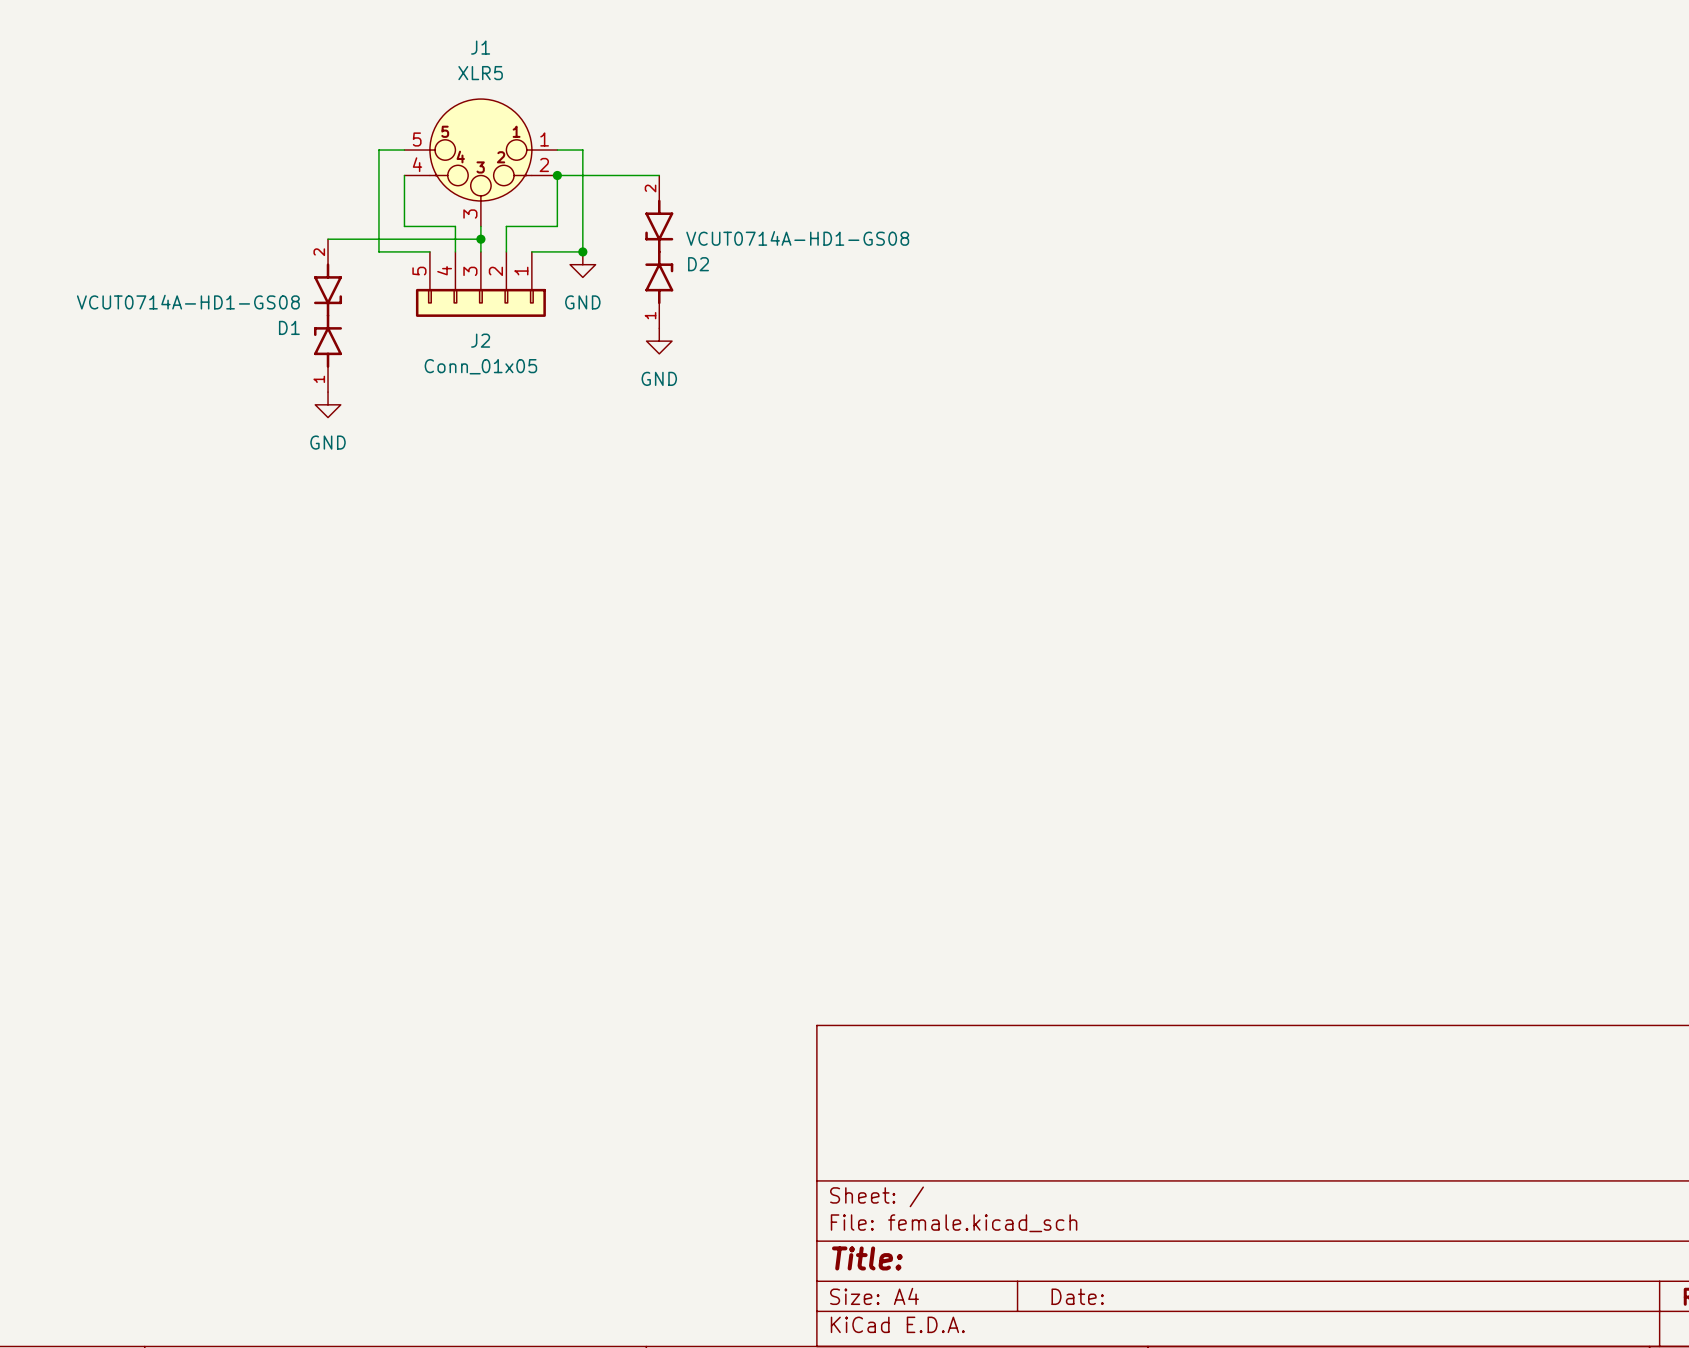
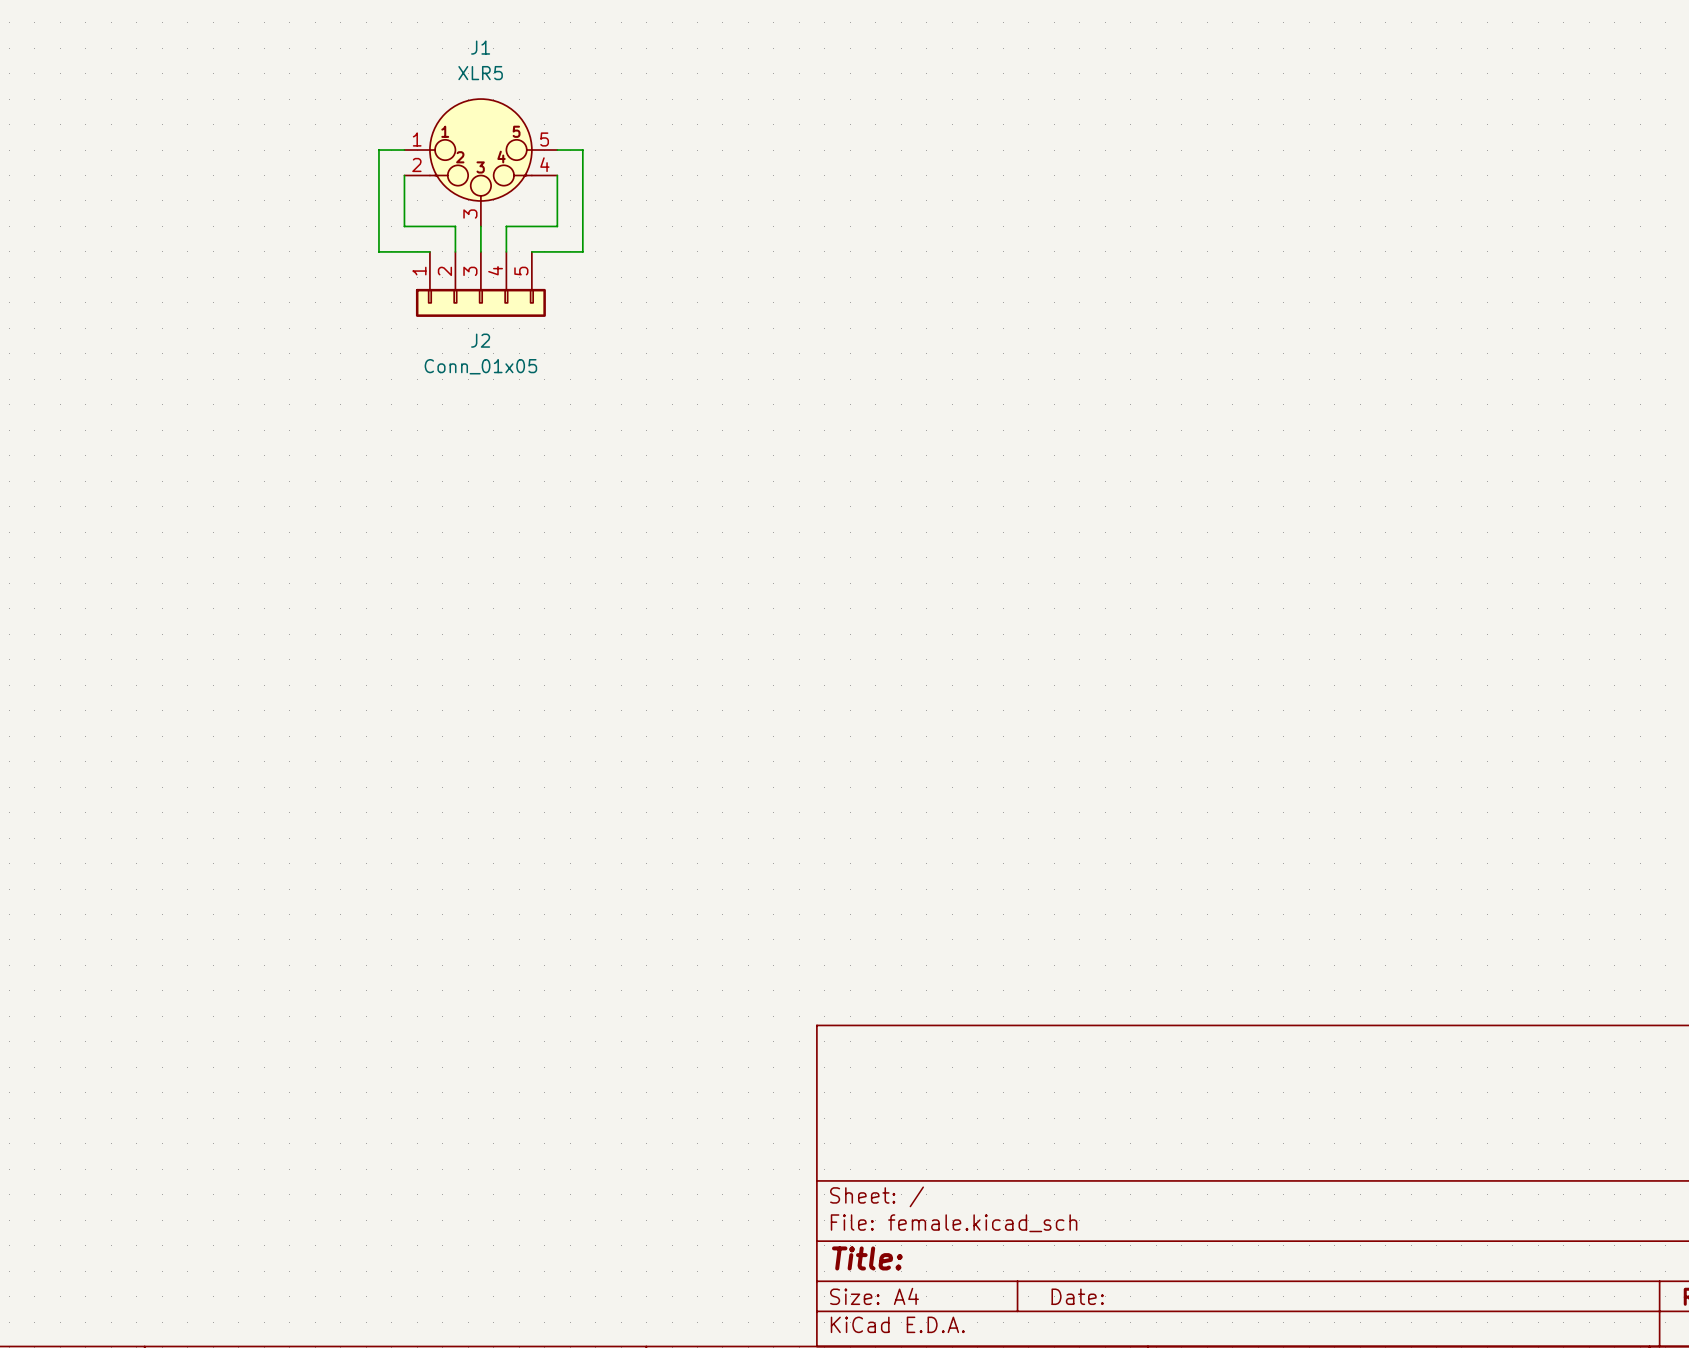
J1 flip: as is (480, 150) -> left-right (480, 150)
wire: (557, 175) (659, 175) -> none
junction: (557, 175) -> none
wire: (328, 239) (480, 239) -> none
junction: (480, 239) -> none
junction: (582, 251) -> none
D2: VCUT0714A-HD1-GS08 (659, 251) -> none
power symbol: GND (582, 264) -> none
J2 flip: as is (480, 302) -> left-right (480, 302)
D1: VCUT0714A-HD1-GS08 (328, 315) -> none
power symbol: GND (659, 341) -> none
power symbol: GND (328, 404) -> none

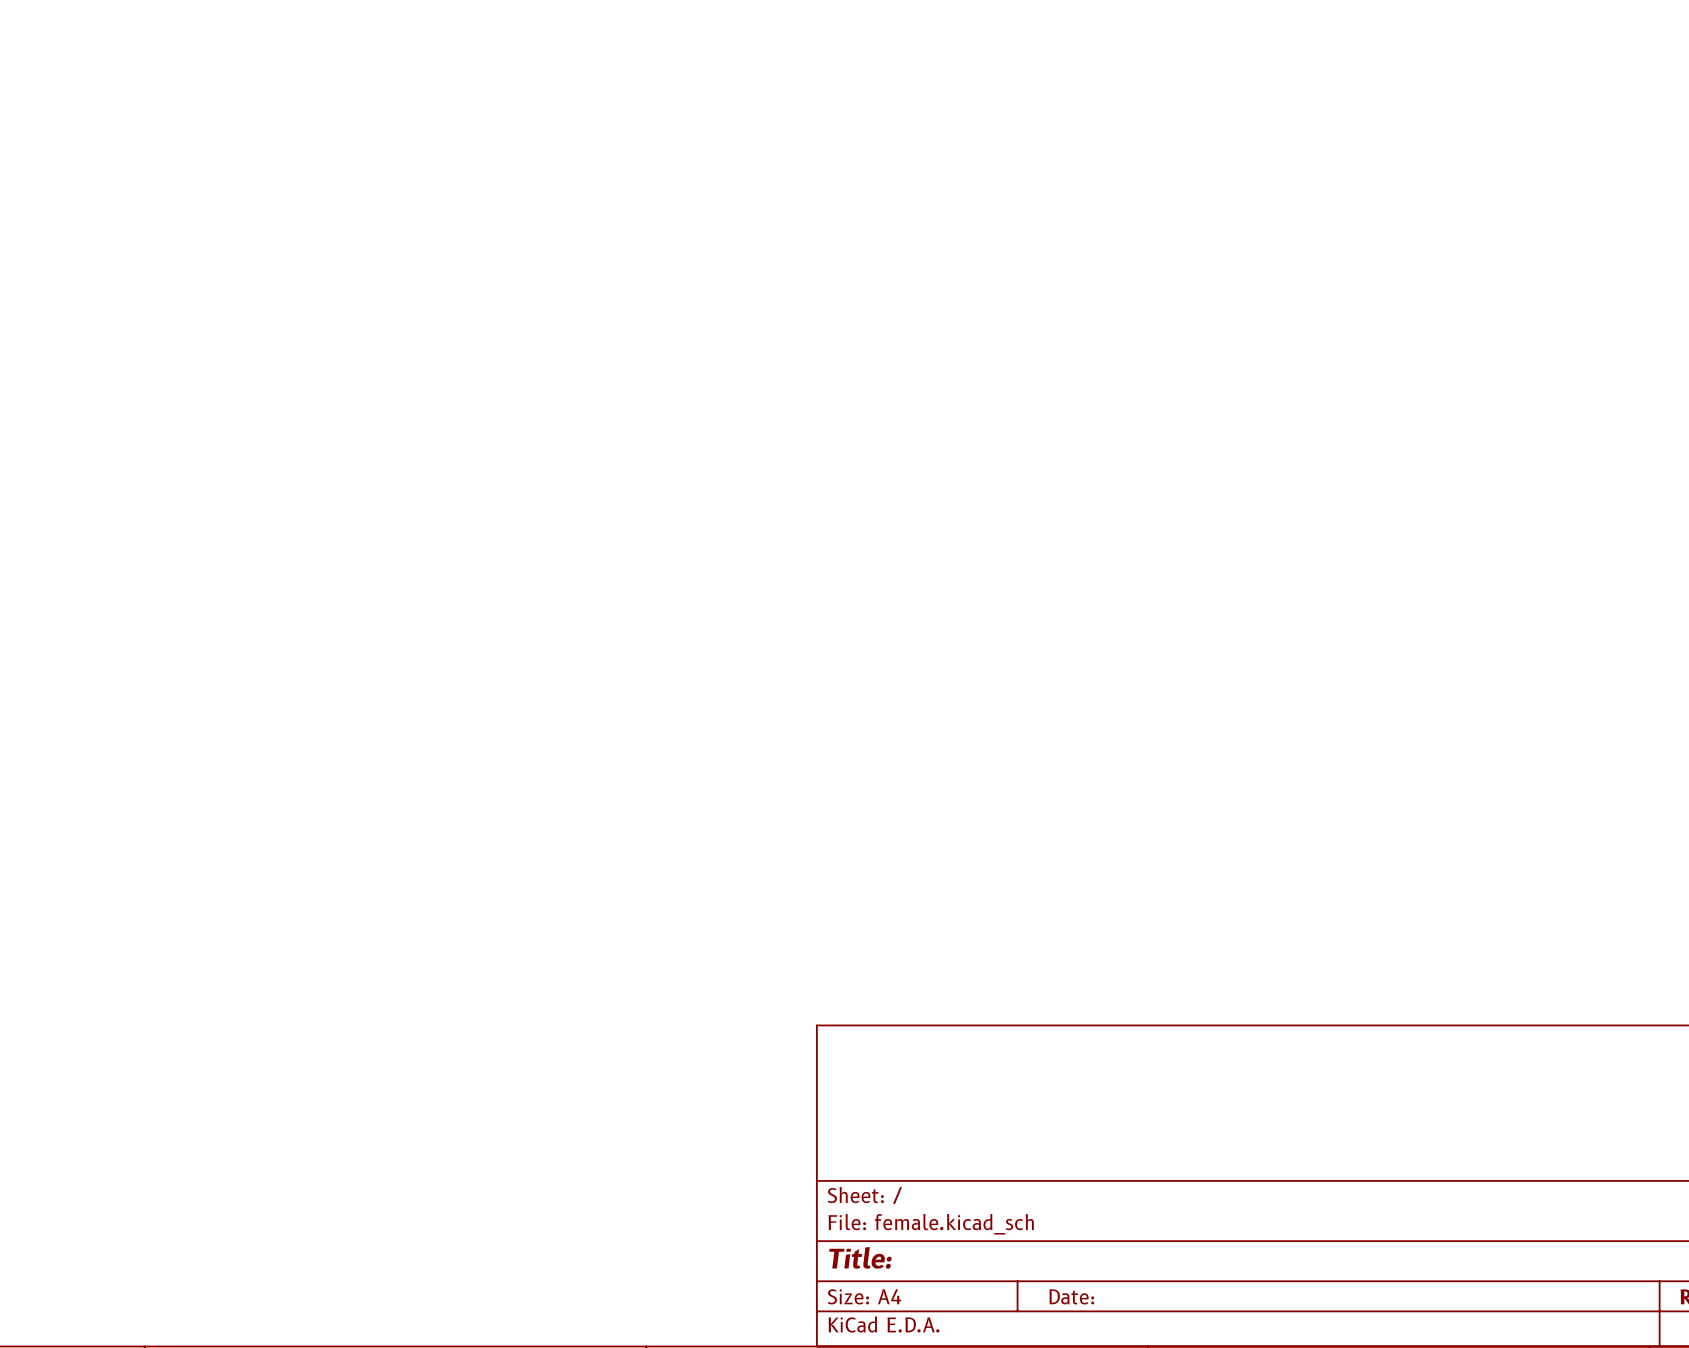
wire: (404, 150) (378, 150) (378, 251) (429, 251) -> none
wire: (557, 150) (582, 150) (582, 251) (531, 251) -> none
J1: XLR5 (480, 162) -> none
wire: (404, 175) (404, 226) (455, 226) (455, 251) -> none
wire: (557, 175) (557, 226) (506, 226) (506, 251) -> none
wire: (480, 226) (480, 251) -> none
J2: Conn_01x05 (480, 284) -> none

